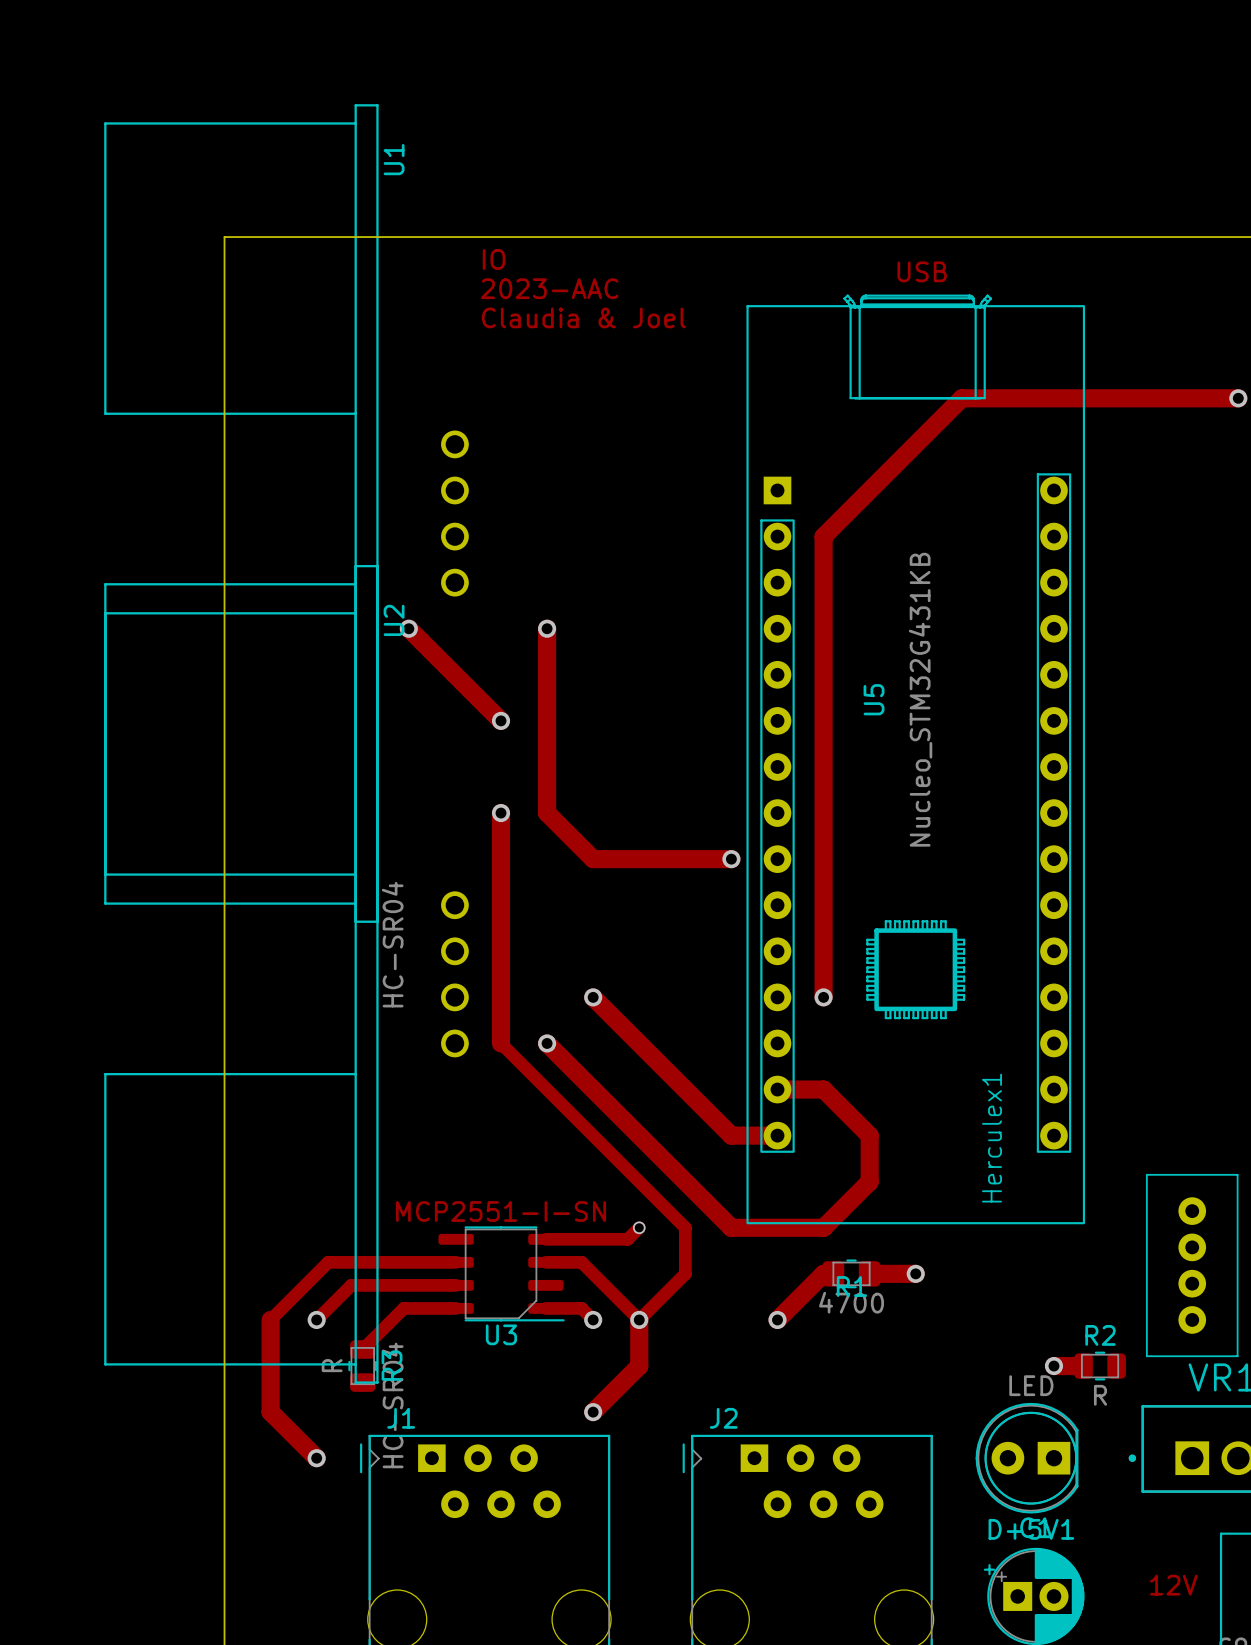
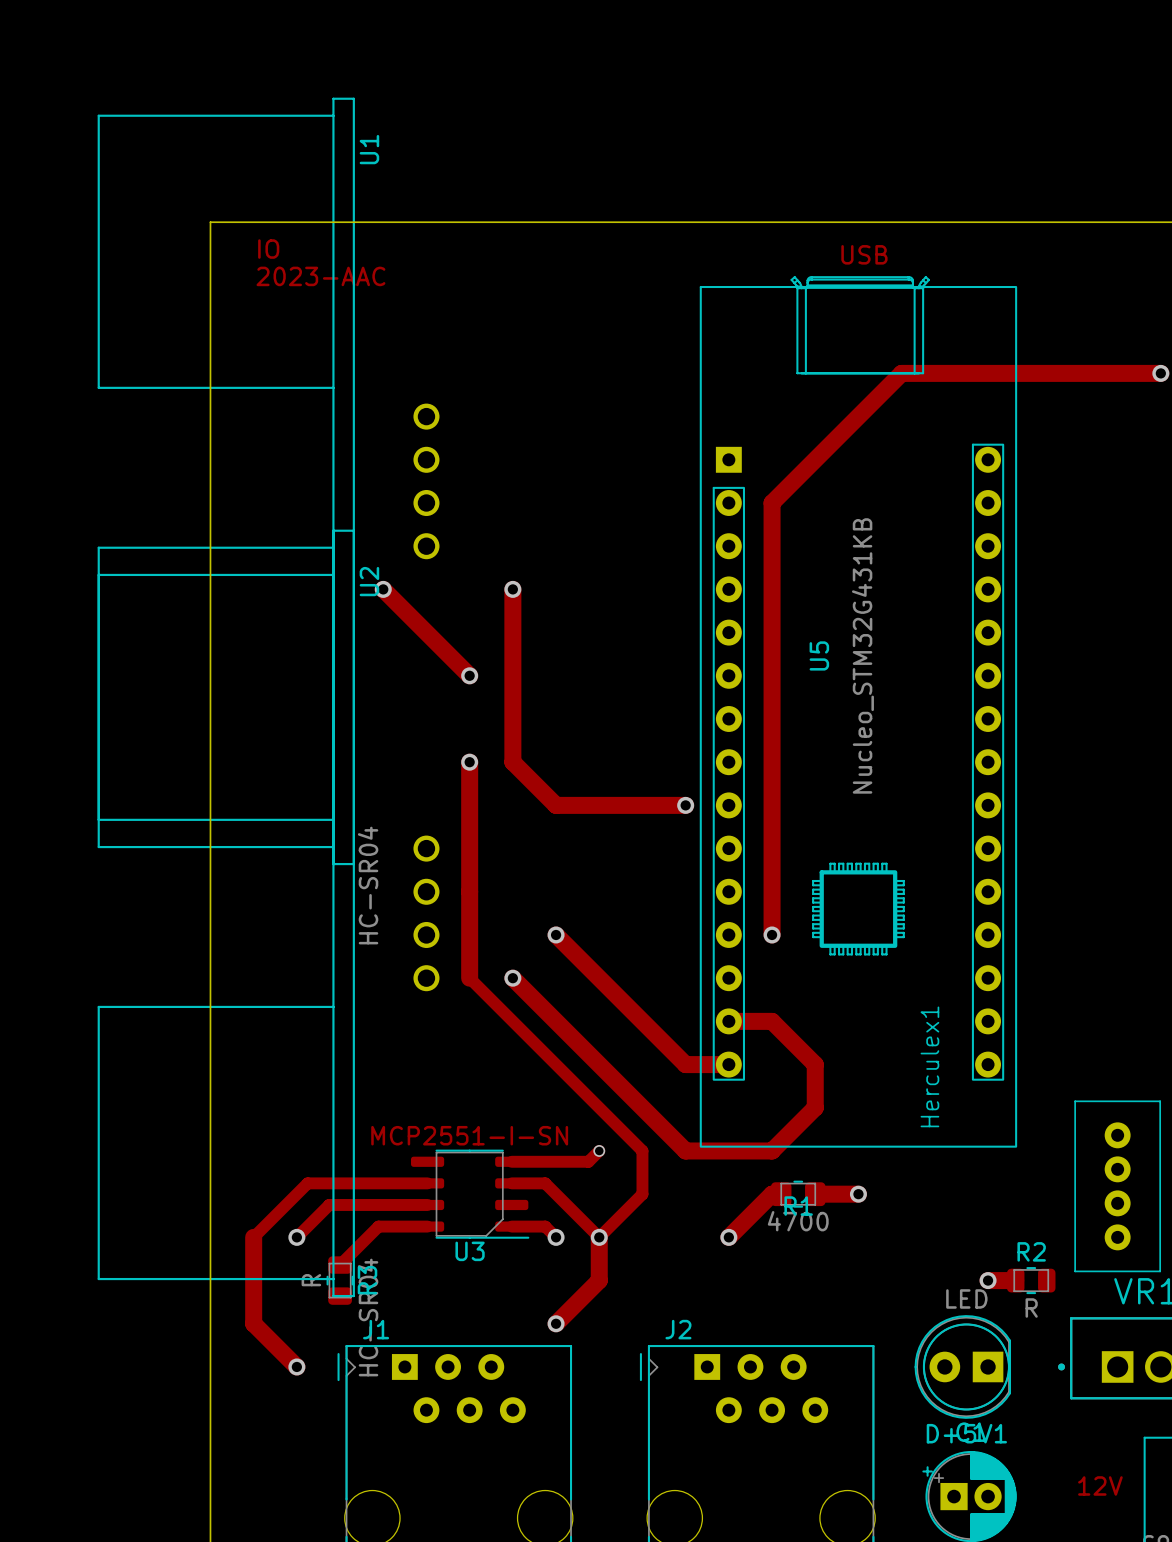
text position: IO (494, 259) -> IO (268, 249)
text position: 2023-AAC (549, 288) -> 2023-AAC (320, 276)
text: Claudia & Joel (583, 317) -> none

